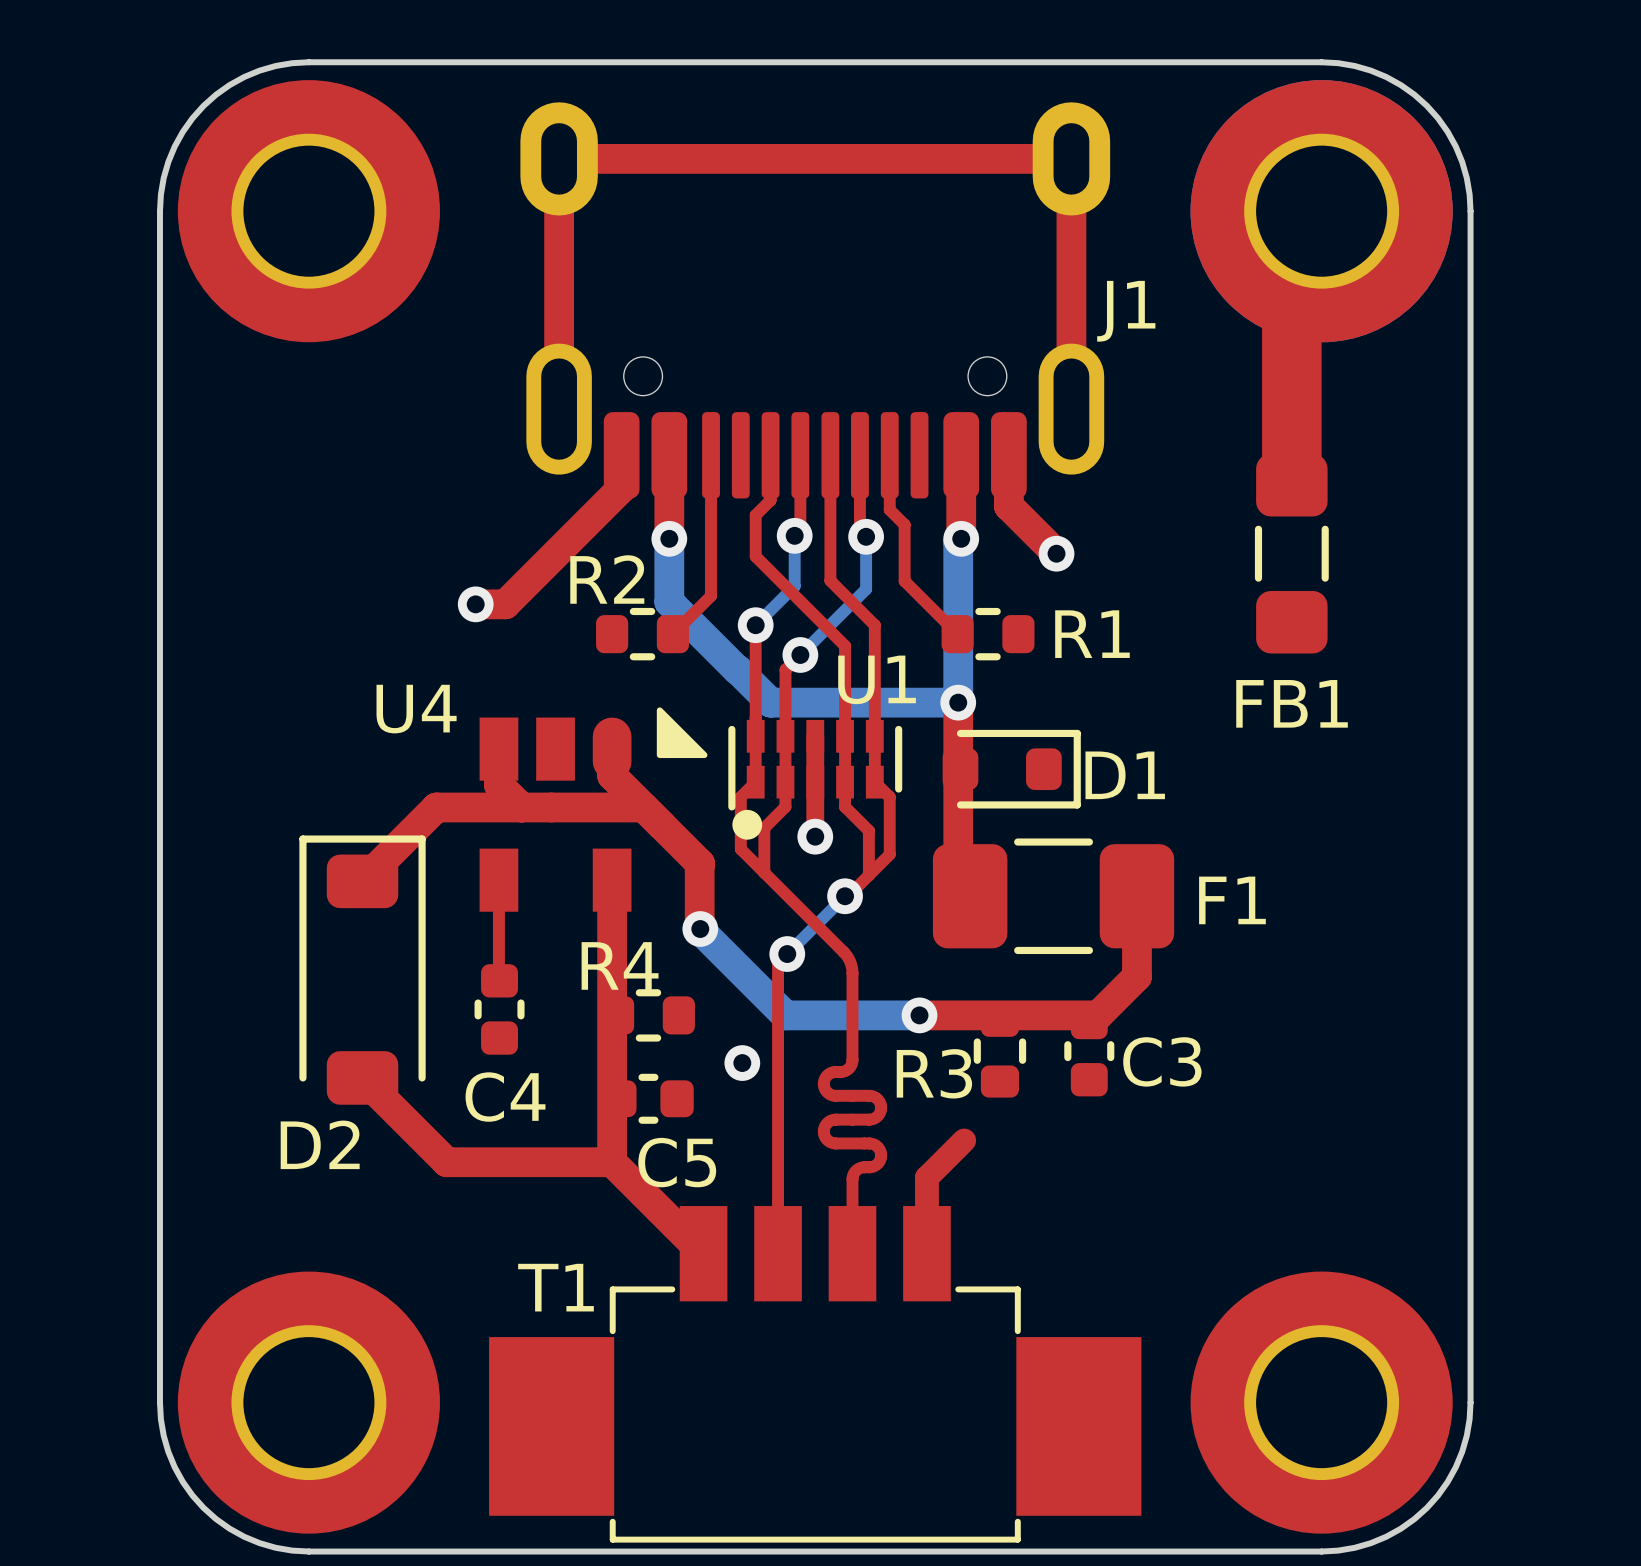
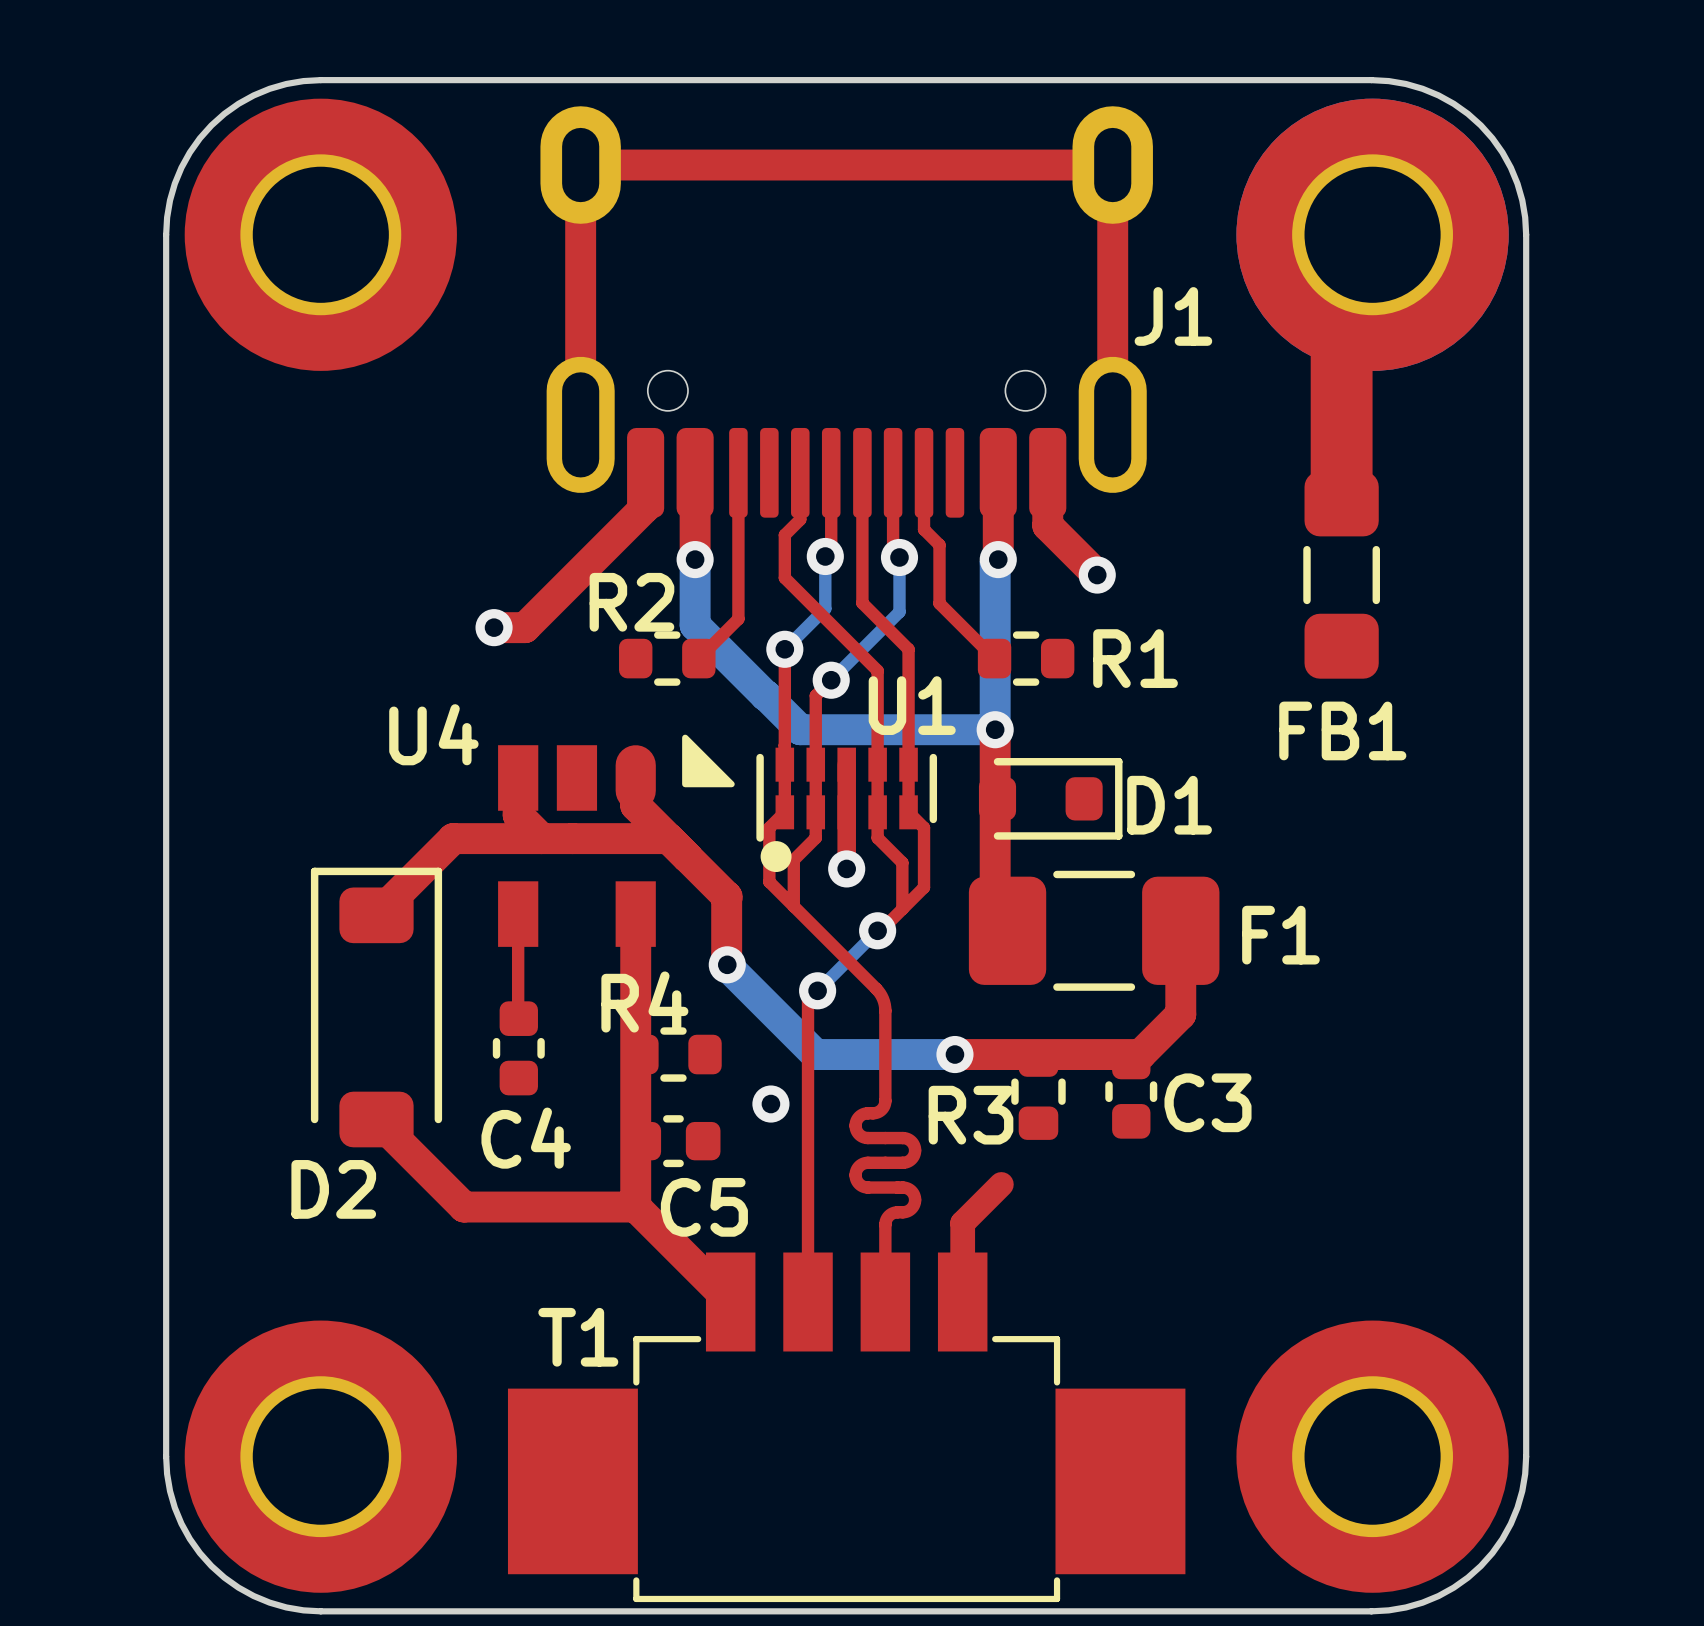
part position: (308, 211) -> (320, 234)
part position: (1321, 211) -> (1372, 234)
board edge: (159, 226) (160, 194) (168, 161) (182, 131) (192, 118) (216, 94) (229, 85) (259, 70) (292, 63) (1321, 62) (1354, 65) (1386, 76) (1414, 94) (1438, 118) (1447, 131) (1462, 161) (1466, 178) (1470, 211) (1469, 1419) (1466, 1435) (1455, 1467) (1438, 1495) (1414, 1519) (1400, 1528) (1370, 1543) (1338, 1550) (1321, 1551) -> (166, 234) (170, 200) (174, 183) (189, 152) (199, 138) (224, 113) (238, 103) (269, 88) (303, 81) (1371, 80) (1405, 83) (1438, 95) (1467, 113) (1492, 138) (1502, 152) (1517, 183) (1525, 217) (1526, 234) (1525, 1473) (1522, 1491) (1510, 1523) (1492, 1553) (1480, 1566) (1453, 1587) (1438, 1596) (1405, 1607) (1371, 1611)

